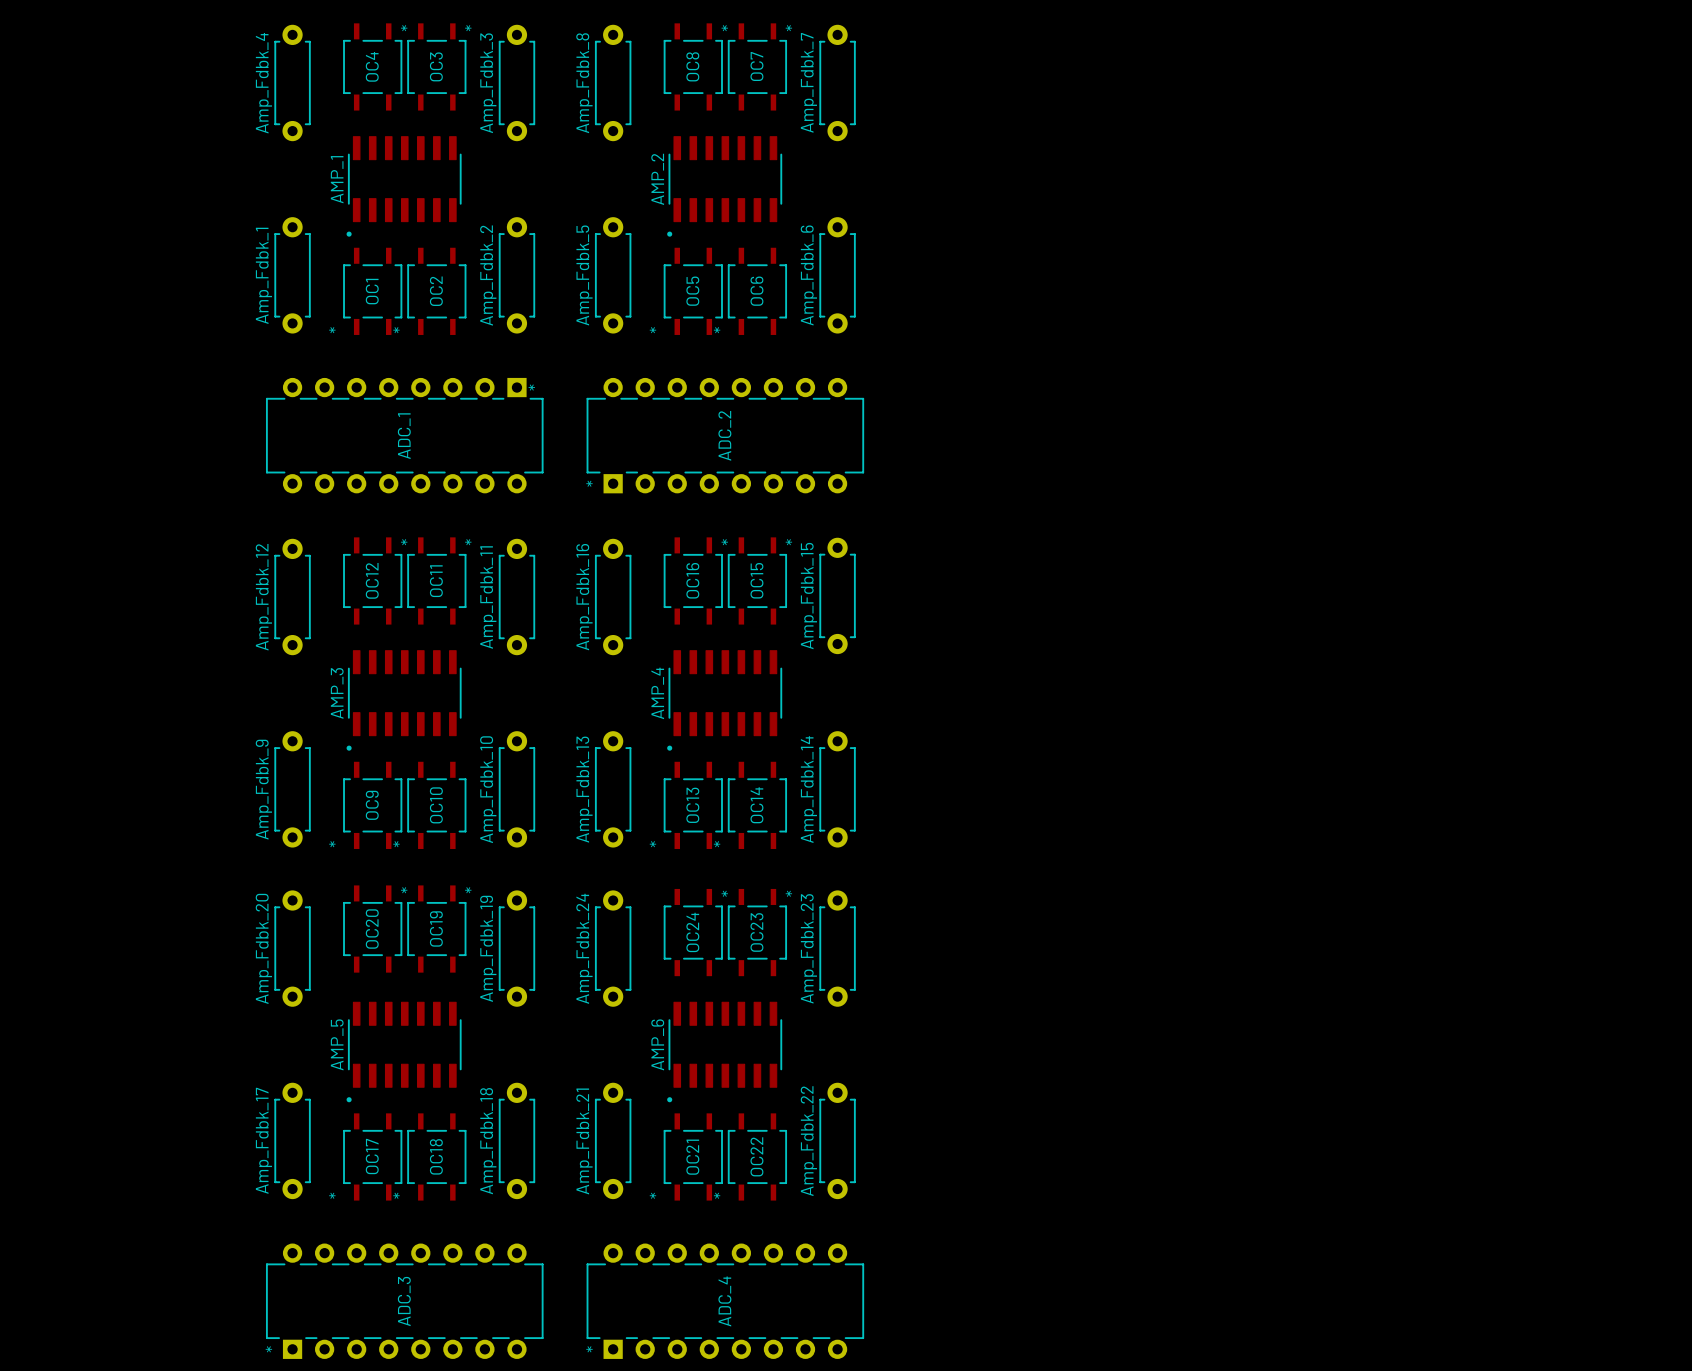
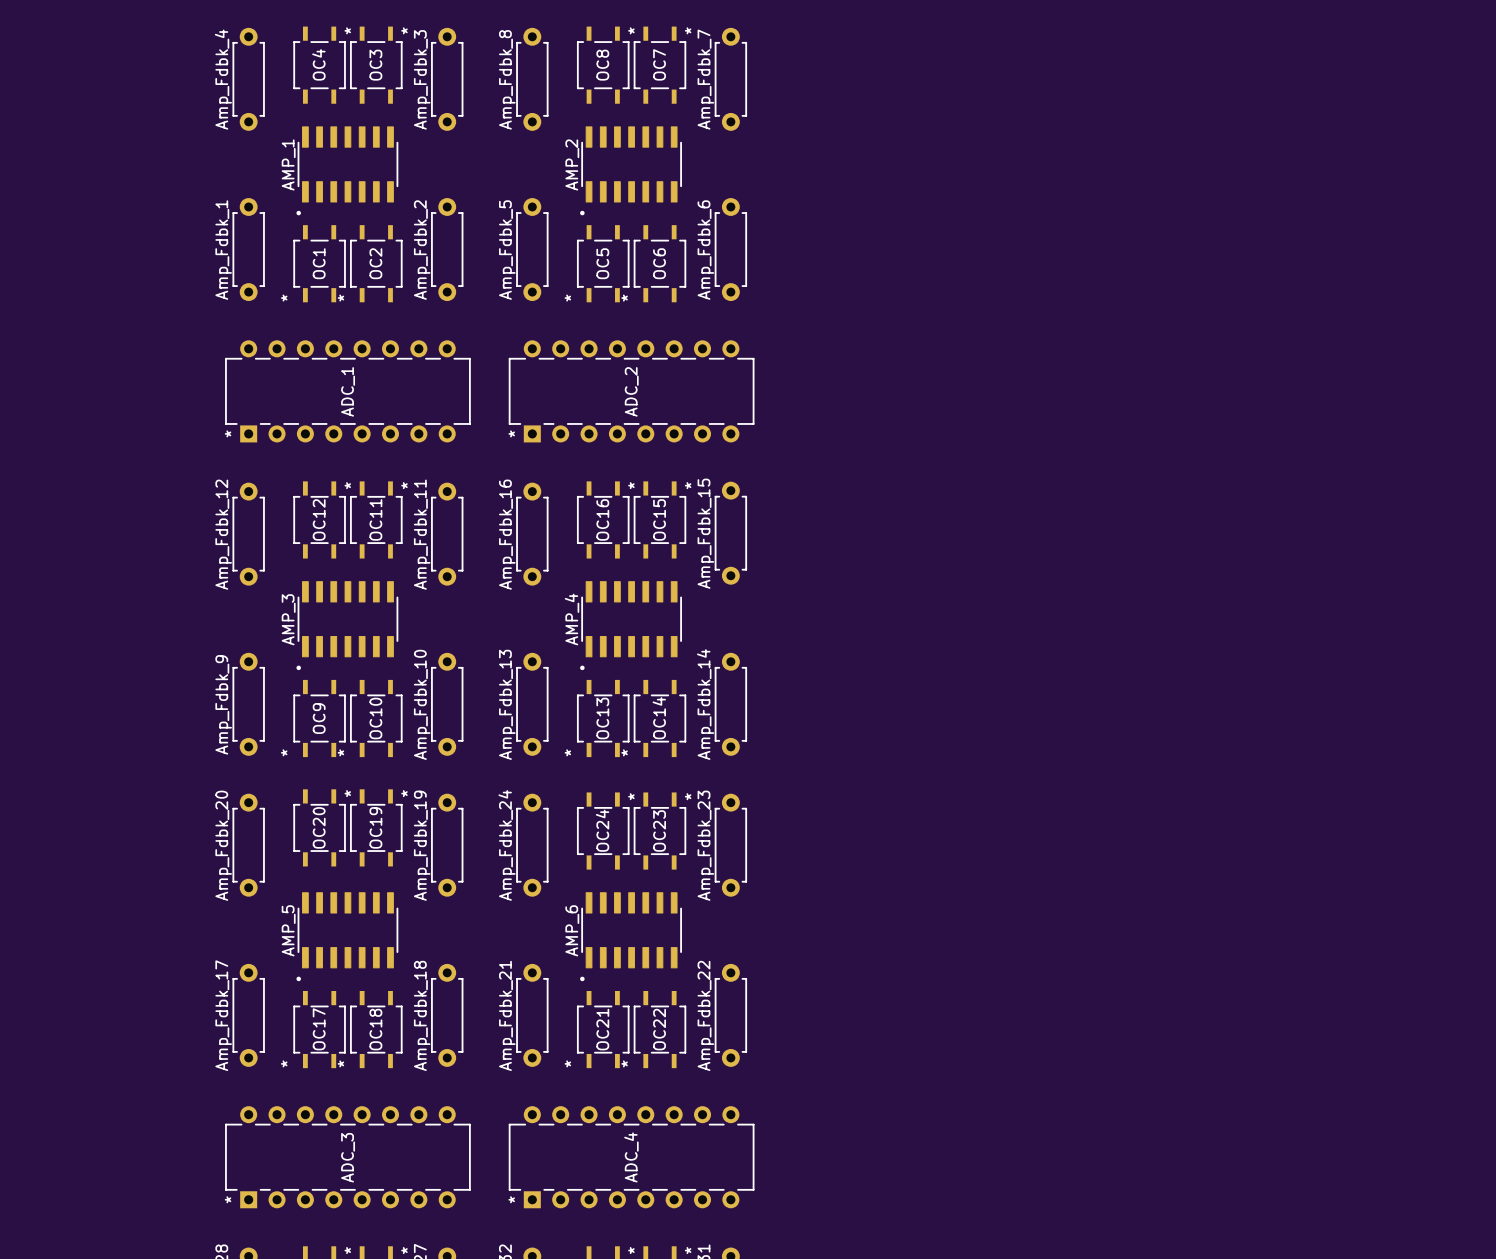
ADC_1 rotation: 0° (404, 435) -> 180° (347, 391)

